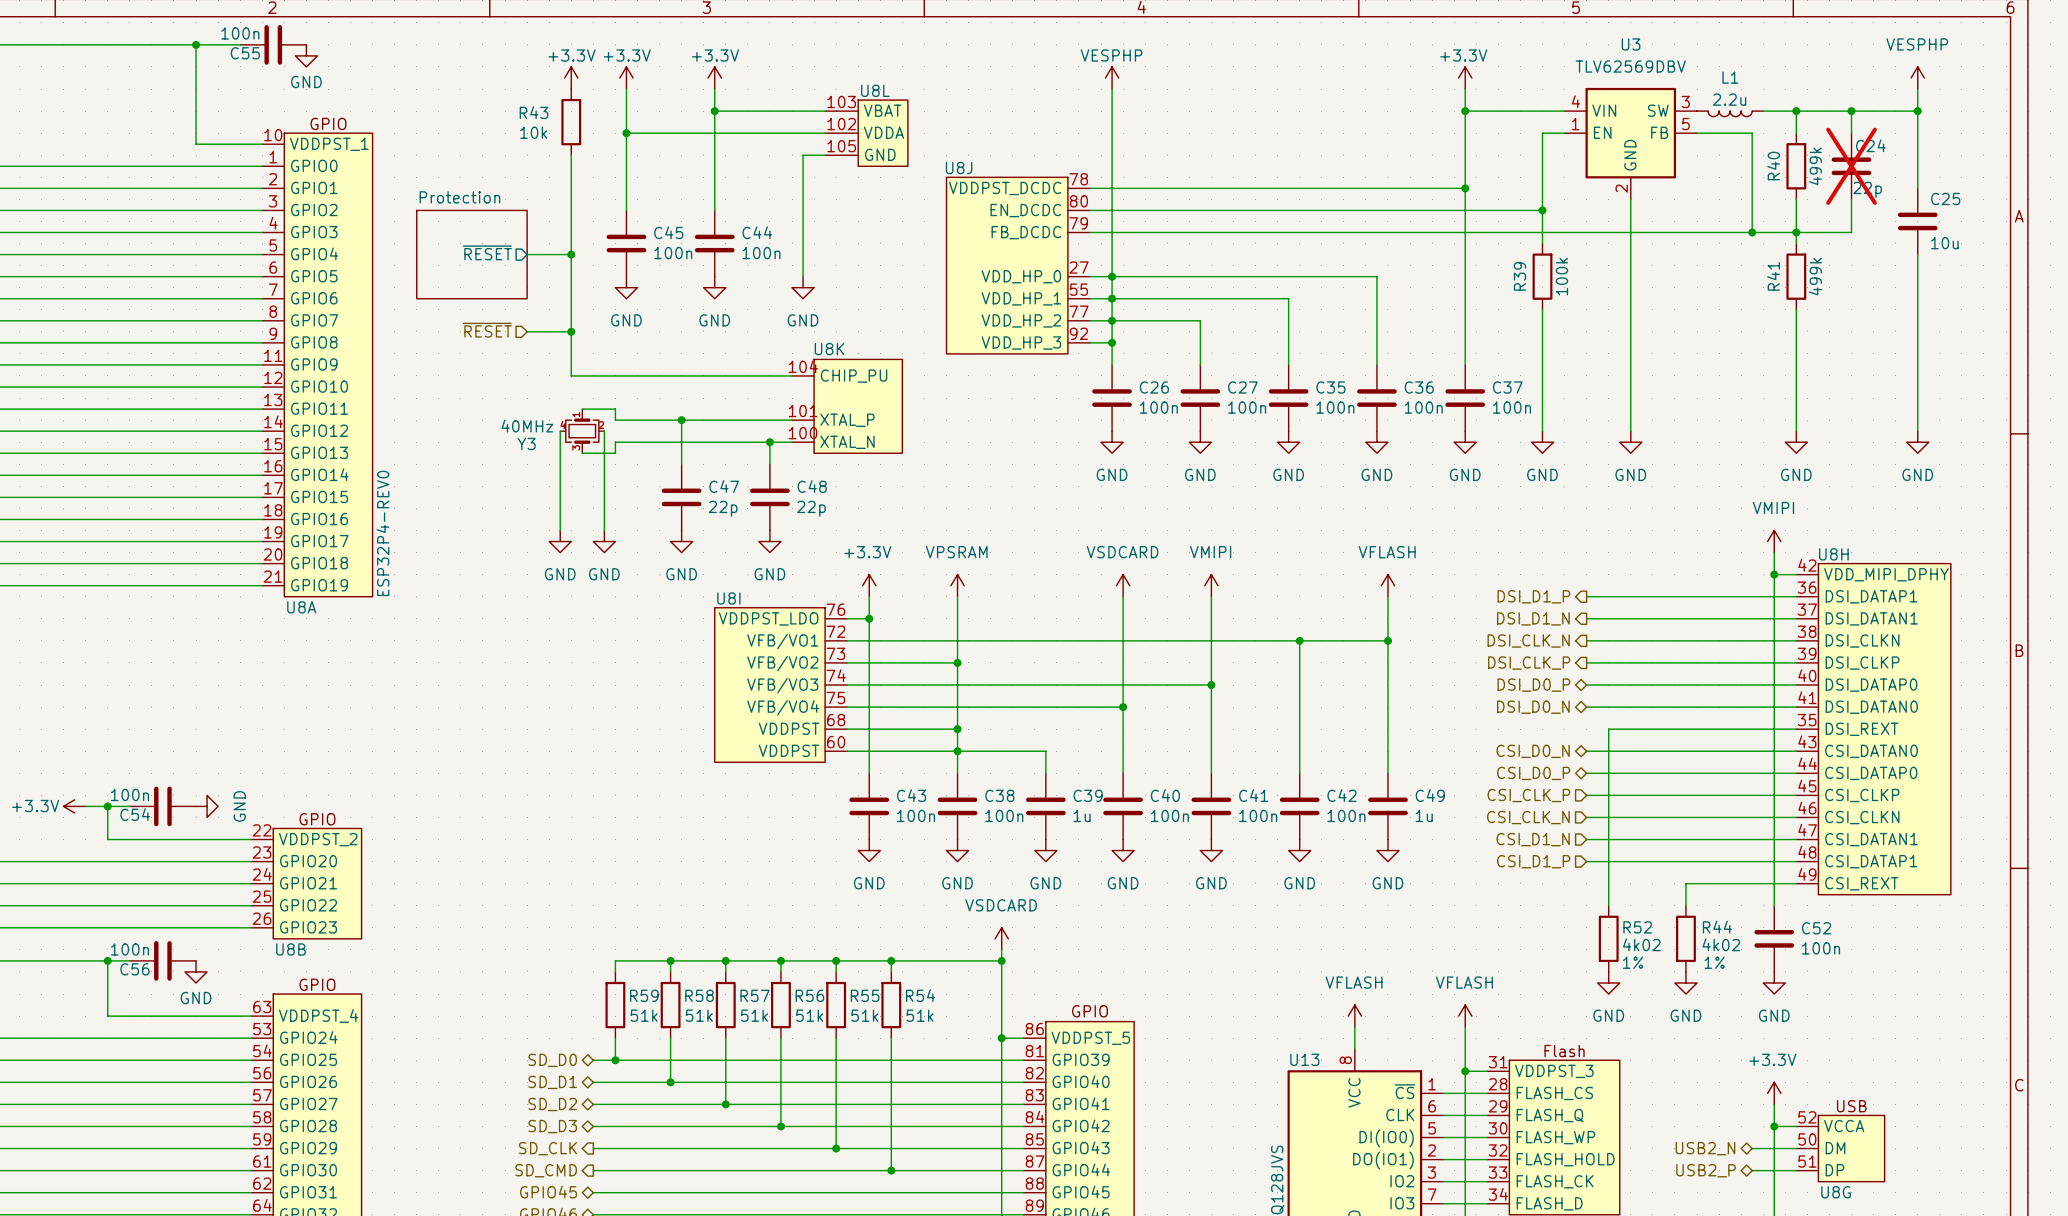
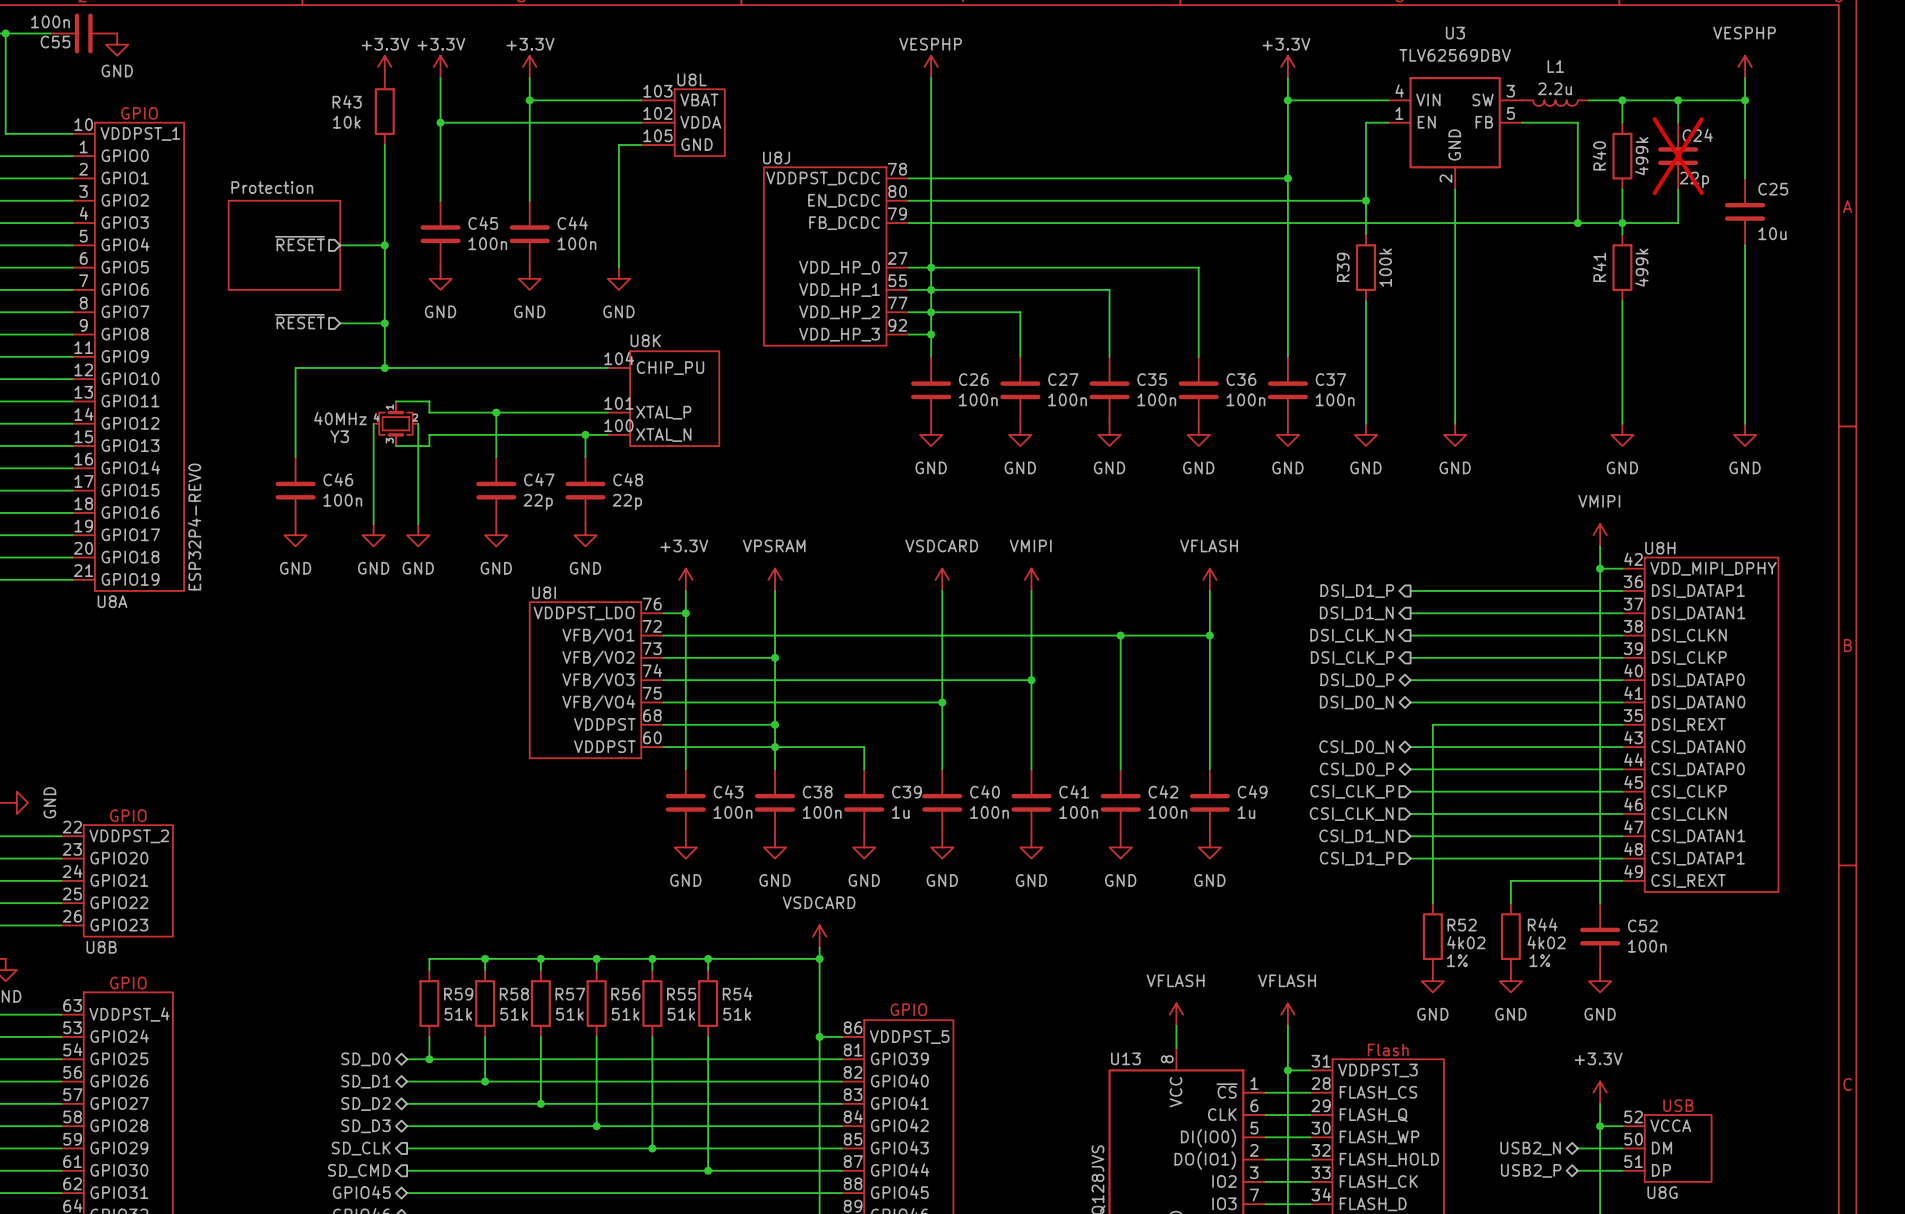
wire: none -> (384, 367) (295, 367) (295, 457)
junction: none -> (384, 367)
C46: none -> 100n (295, 490)
power symbol: none -> GND (295, 535)

